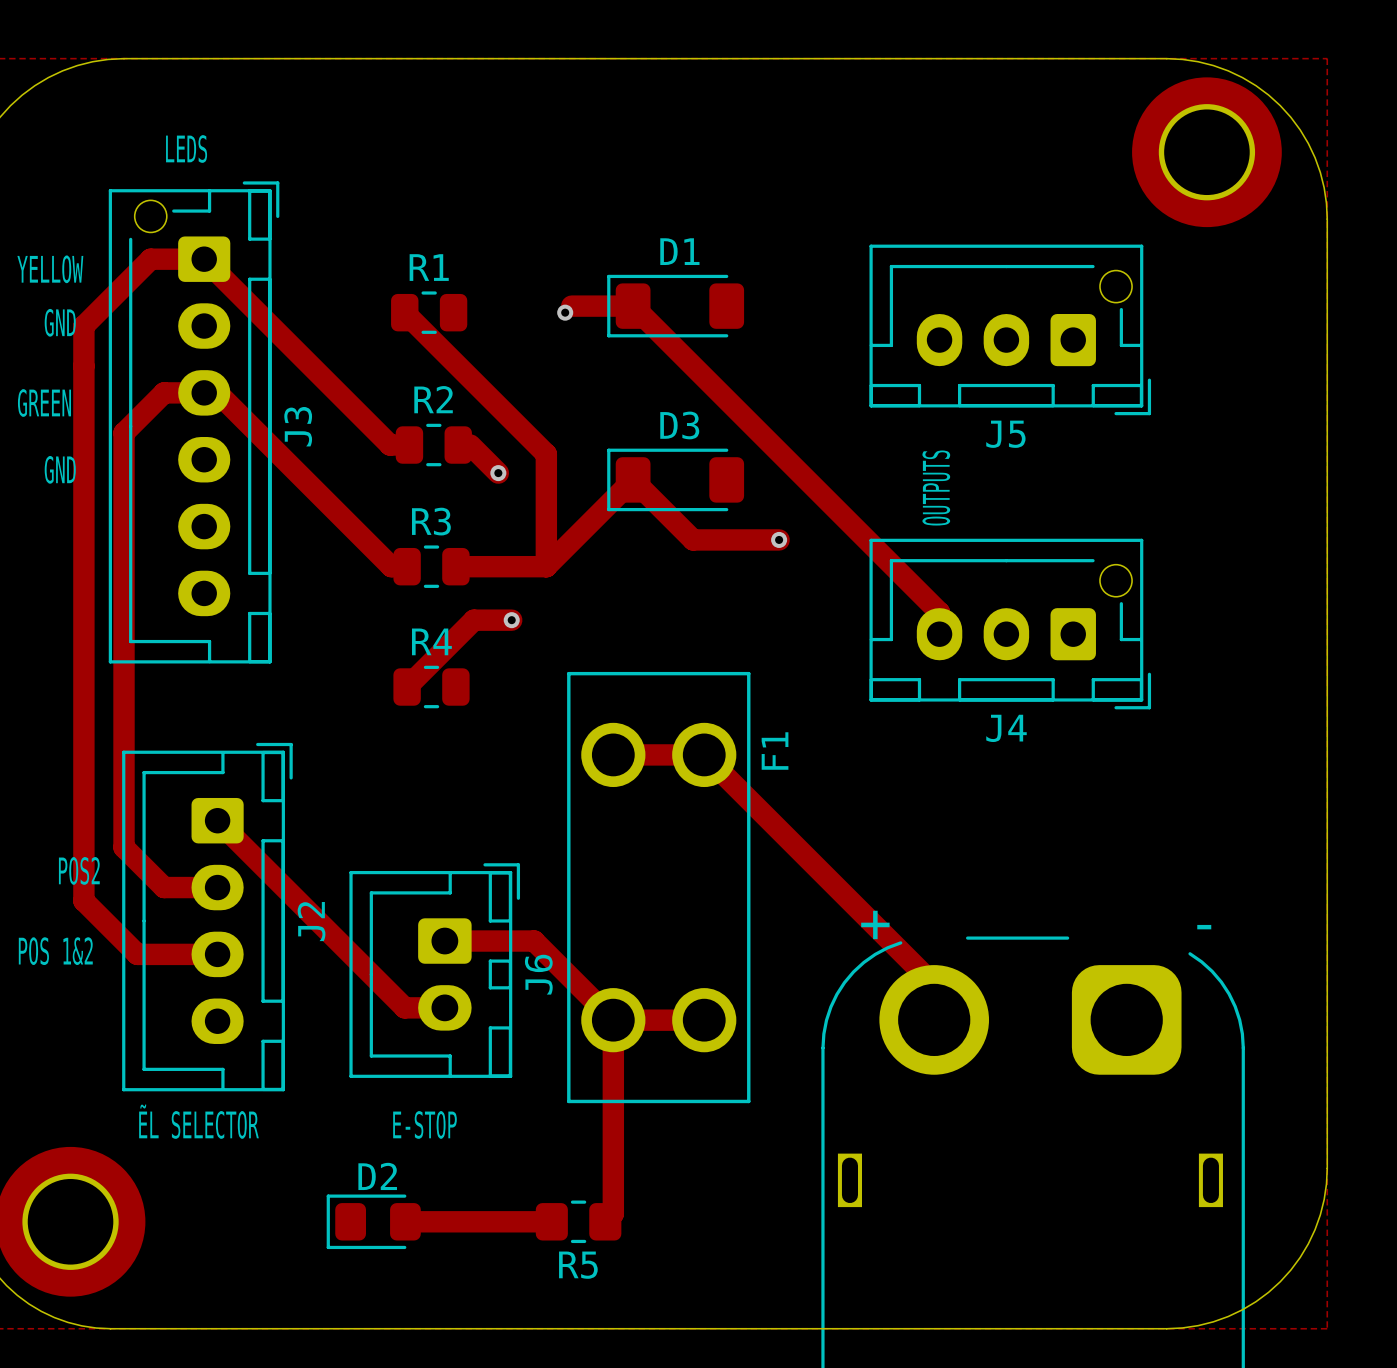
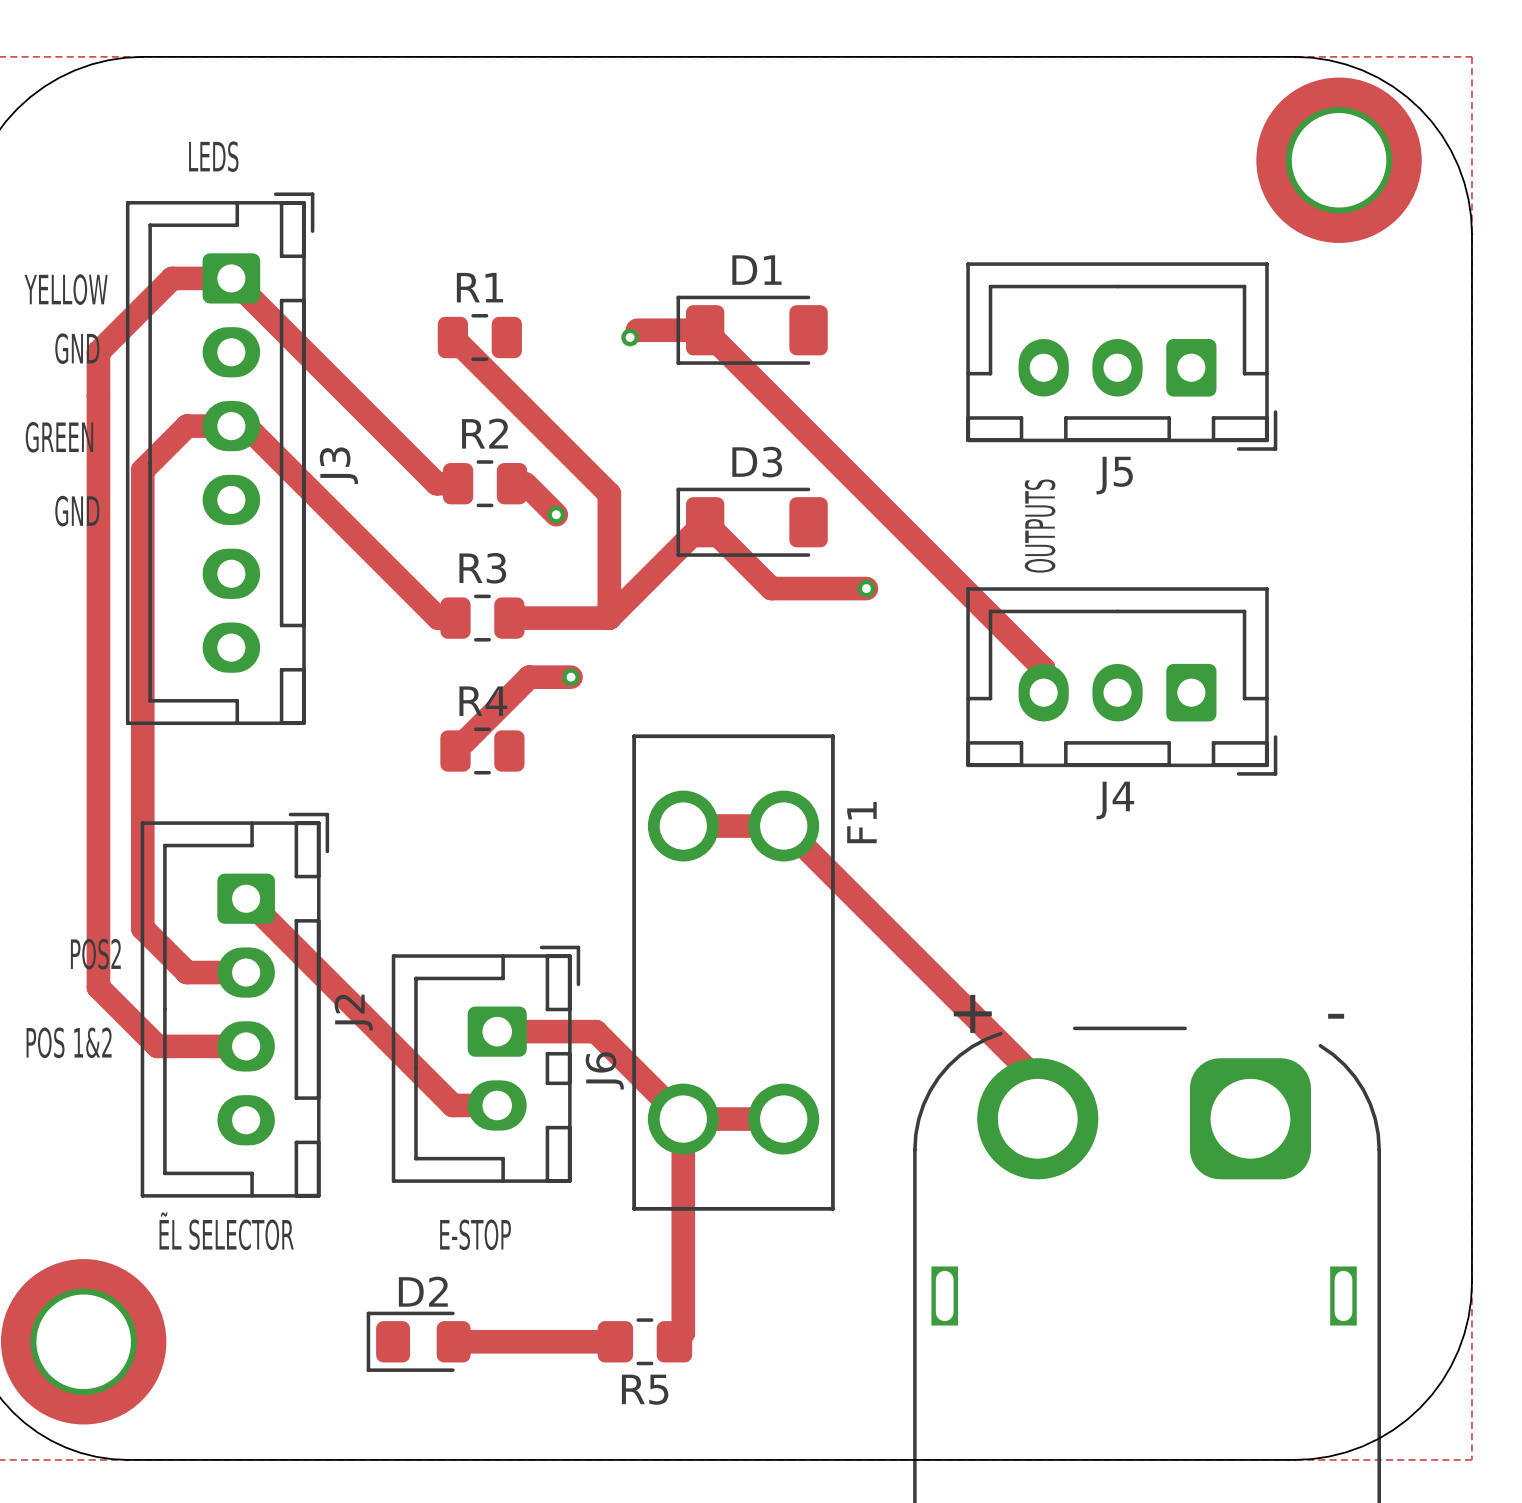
J3 footprint: [108, 181, 280, 664] -> [125, 192, 315, 726]
J5 footprint: [869, 244, 1152, 416] -> [966, 262, 1278, 451]
J4 footprint: [869, 538, 1152, 710] -> [966, 587, 1278, 776]

